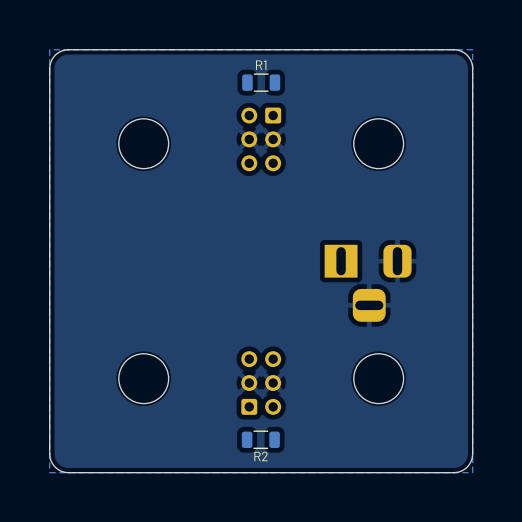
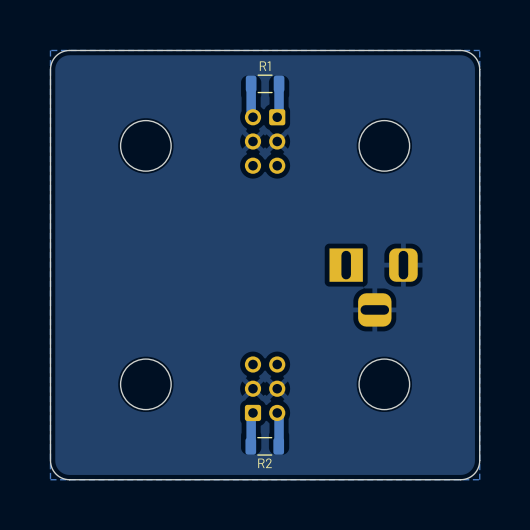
track: none -> (251, 88) (251, 115) (252, 117)
track: none -> (279, 88) (279, 115) (277, 117)
track: none -> (252, 412) (251, 414) (251, 441)
track: none -> (277, 412) (279, 414) (279, 441)

